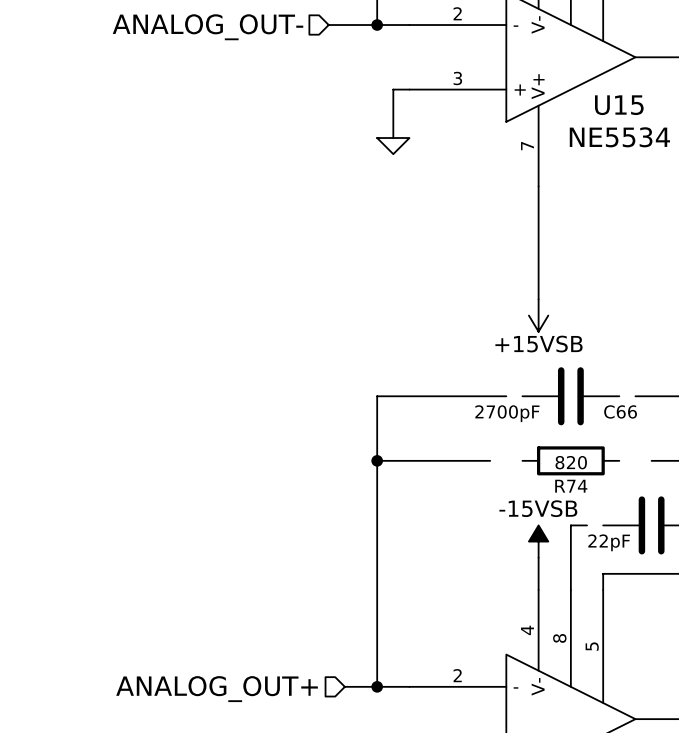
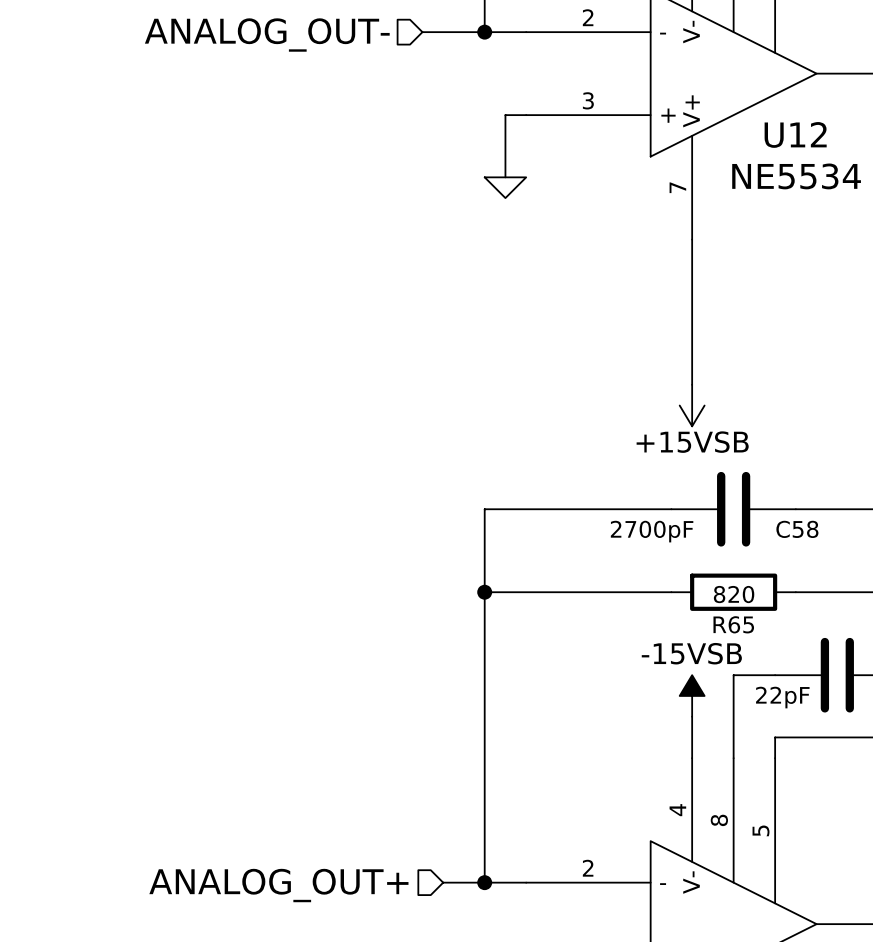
U15 name: U15 (619, 105) -> U12 (795, 134)
wire: none -> (650, 509) (671, 509)
wire: none -> (795, 509) (816, 509)
C66 name: C66 (620, 411) -> C58 (797, 529)
wire: none -> (629, 592) (671, 592)
wire: none -> (795, 592) (837, 592)
R74 name: R74 (571, 486) -> R65 (733, 624)
wire: none -> (754, 675) (775, 675)

